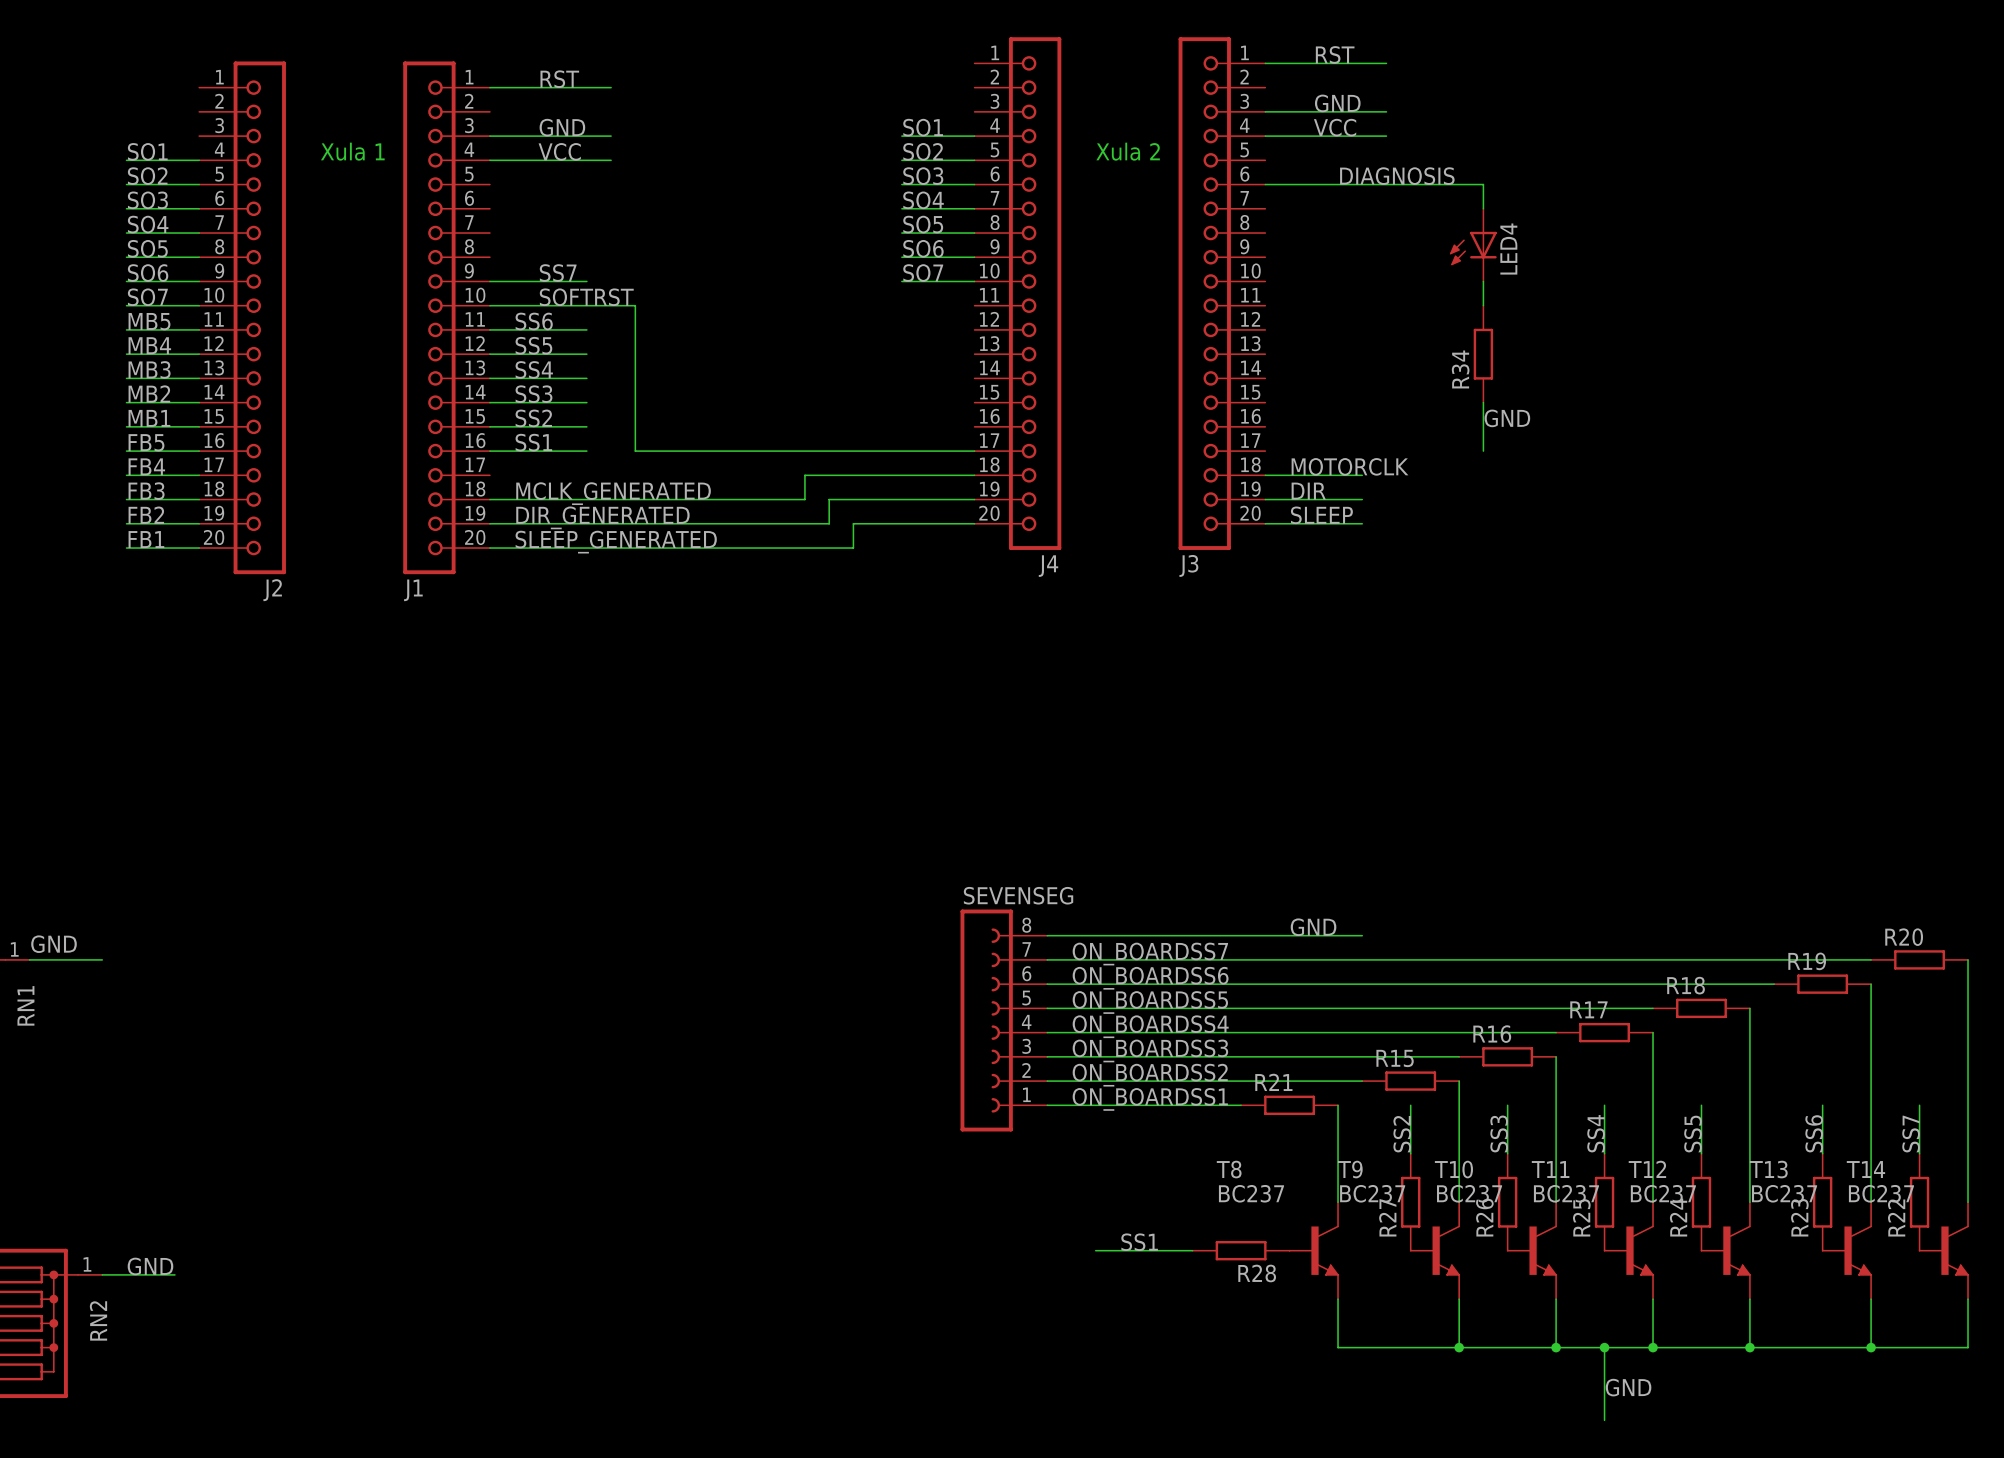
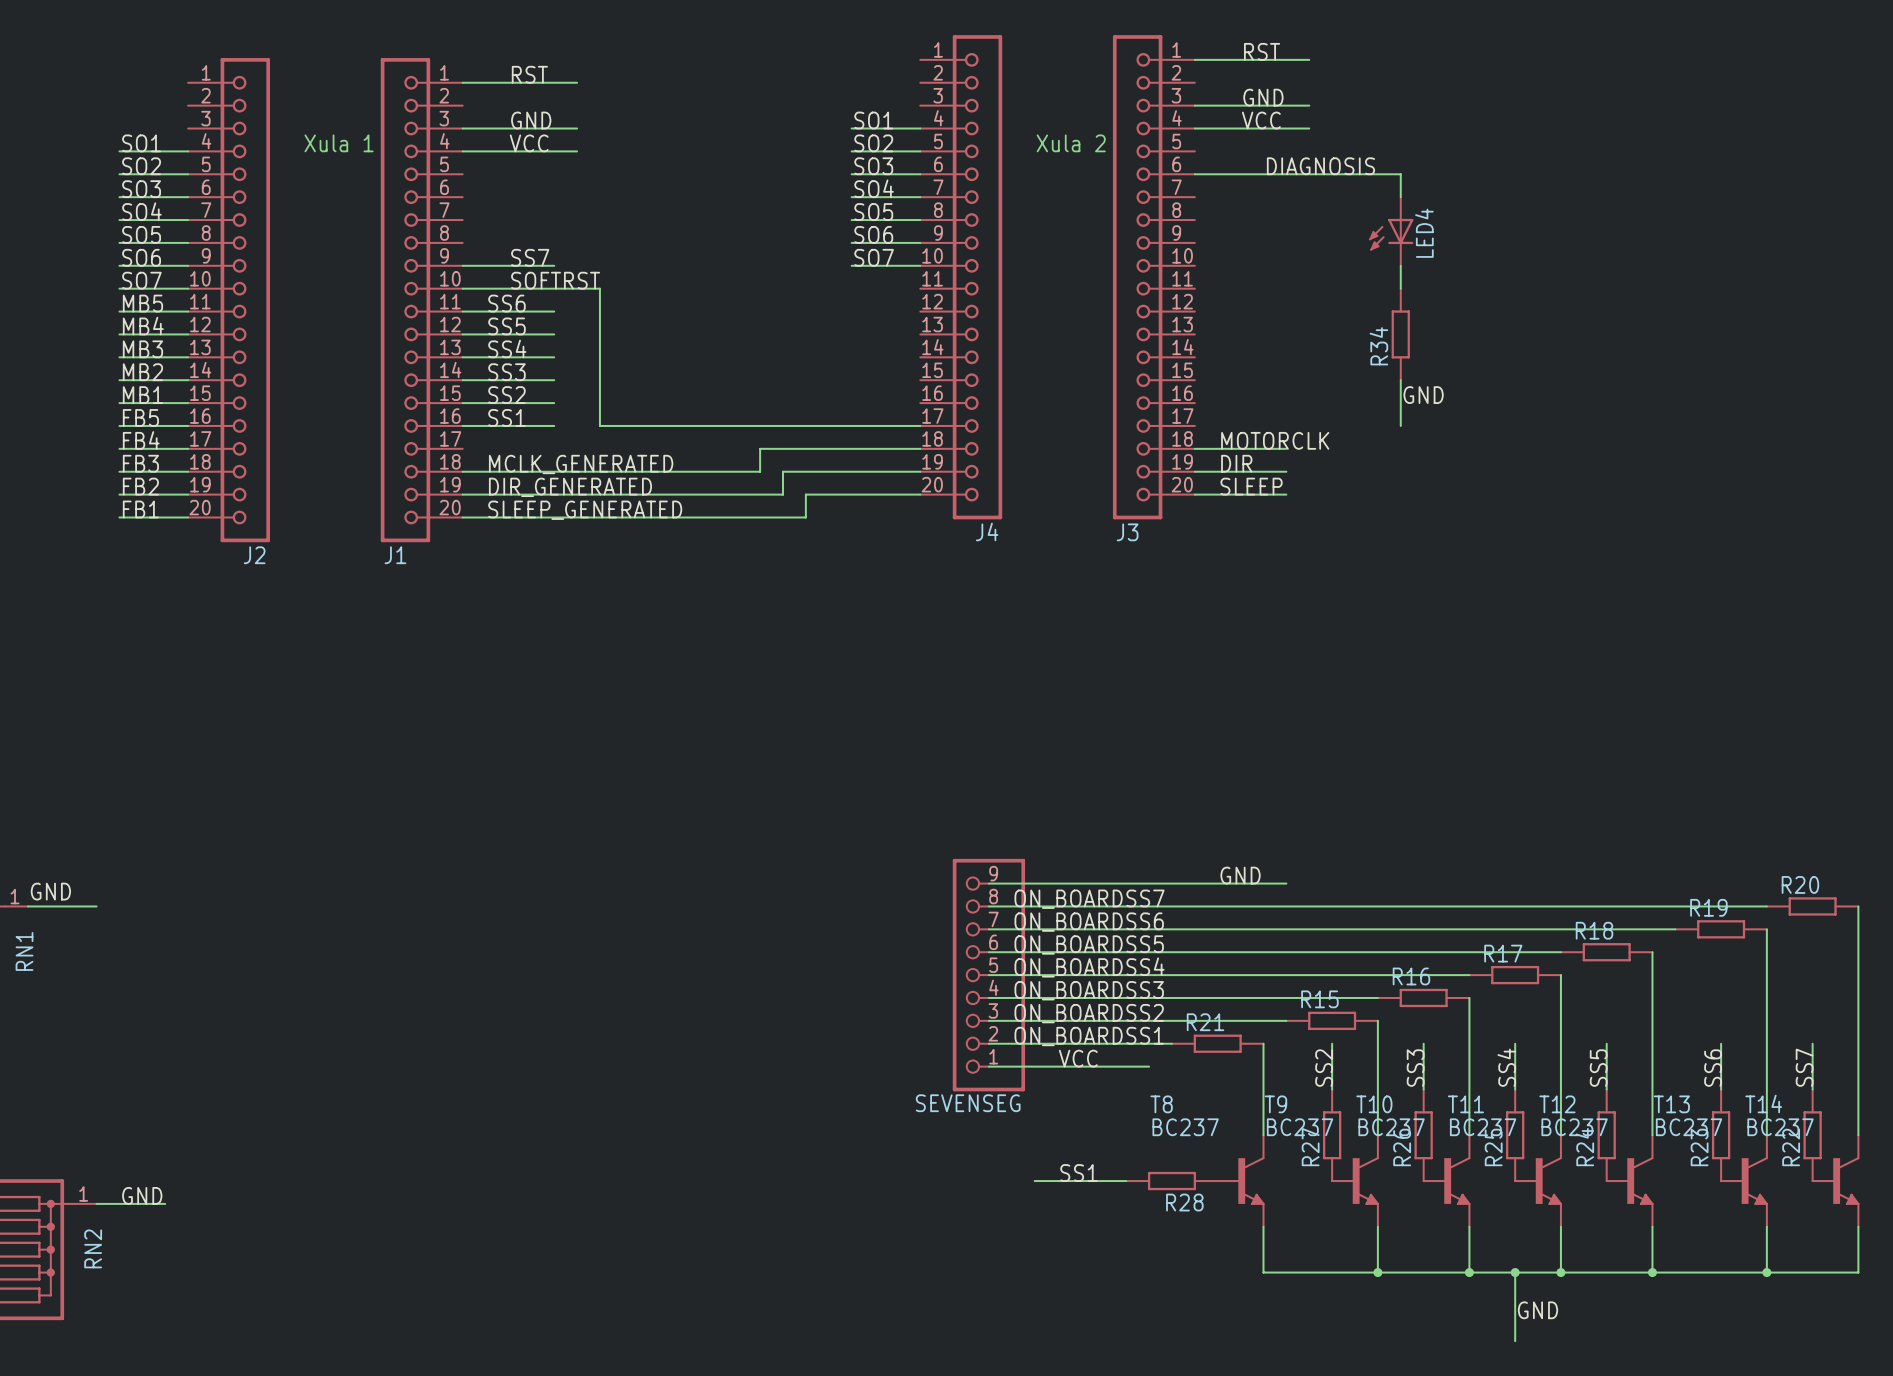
SEVENSEG: (1003, 1020) -> none
SEVENSEG: none -> (988, 975)
label: none -> VCC (1078, 1058)
wire: none -> (988, 1066) (1149, 1066)

